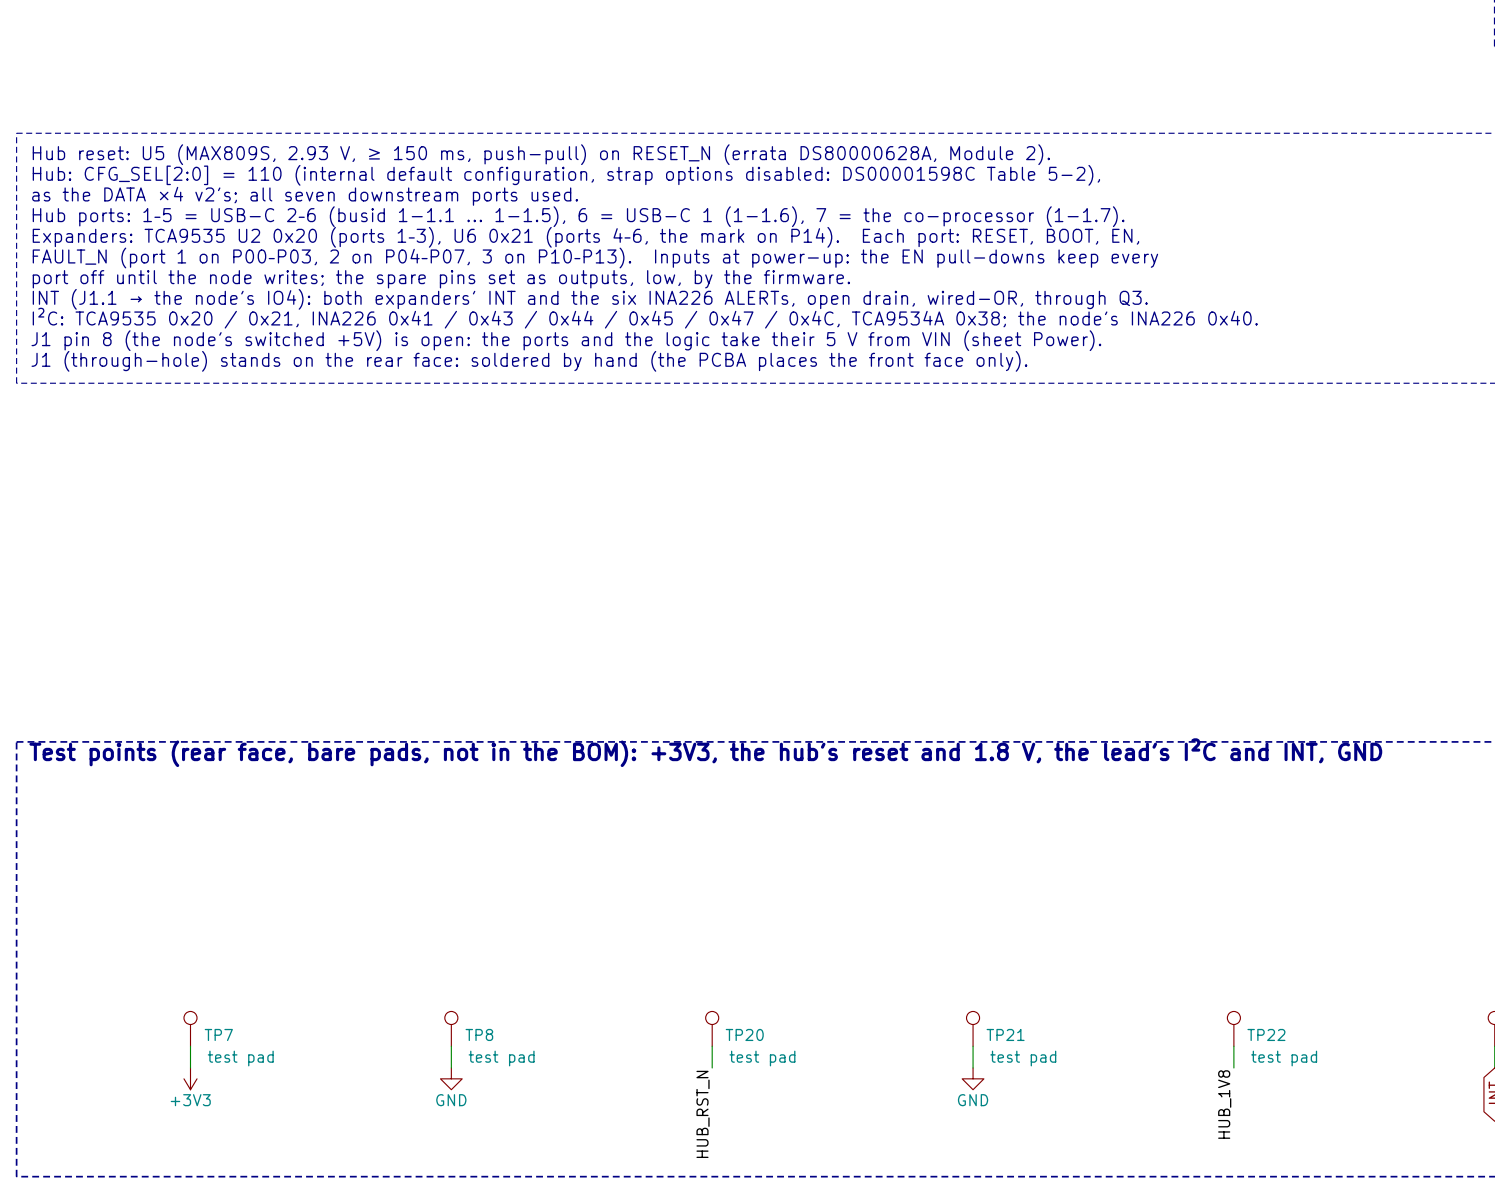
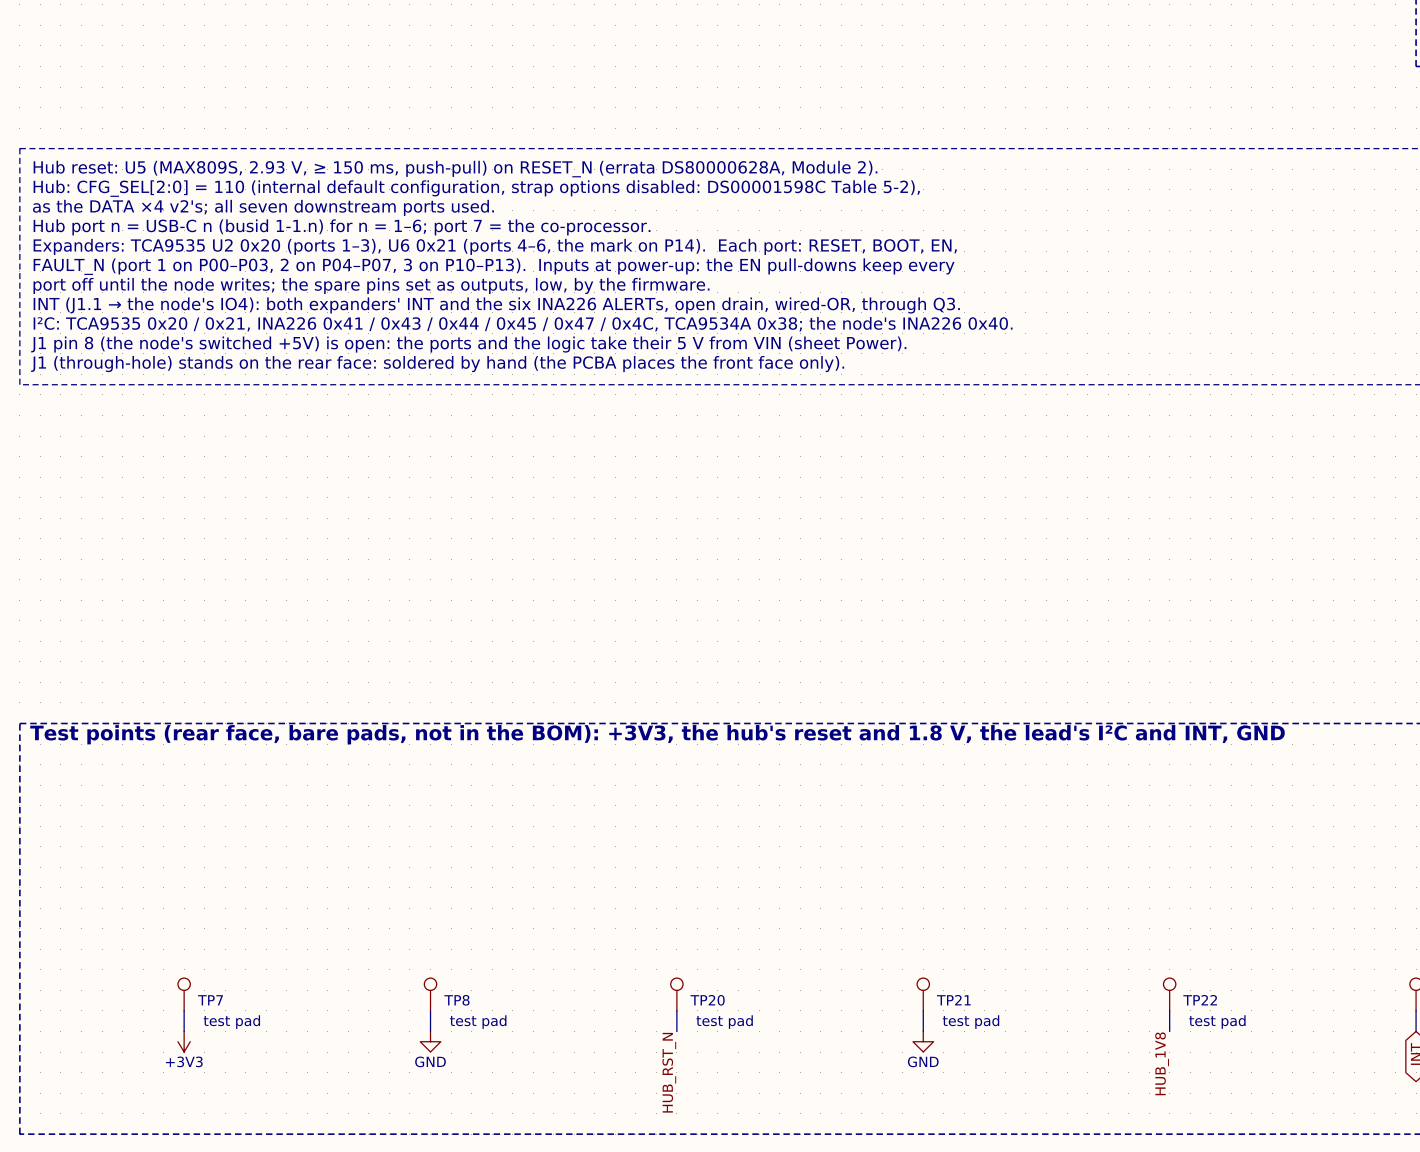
text: Hub ports: 1–5 = USB-C 2–6 (busid 1-1.1 … 1-1.5), 6 = USB-C 1 (1-1.6), 7 = the co-processor (1-1.7). (578, 216) -> Hub port n = USB-C n (busid 1-1.n) for n = 1–6; port 7 = the co-processor. (342, 227)

